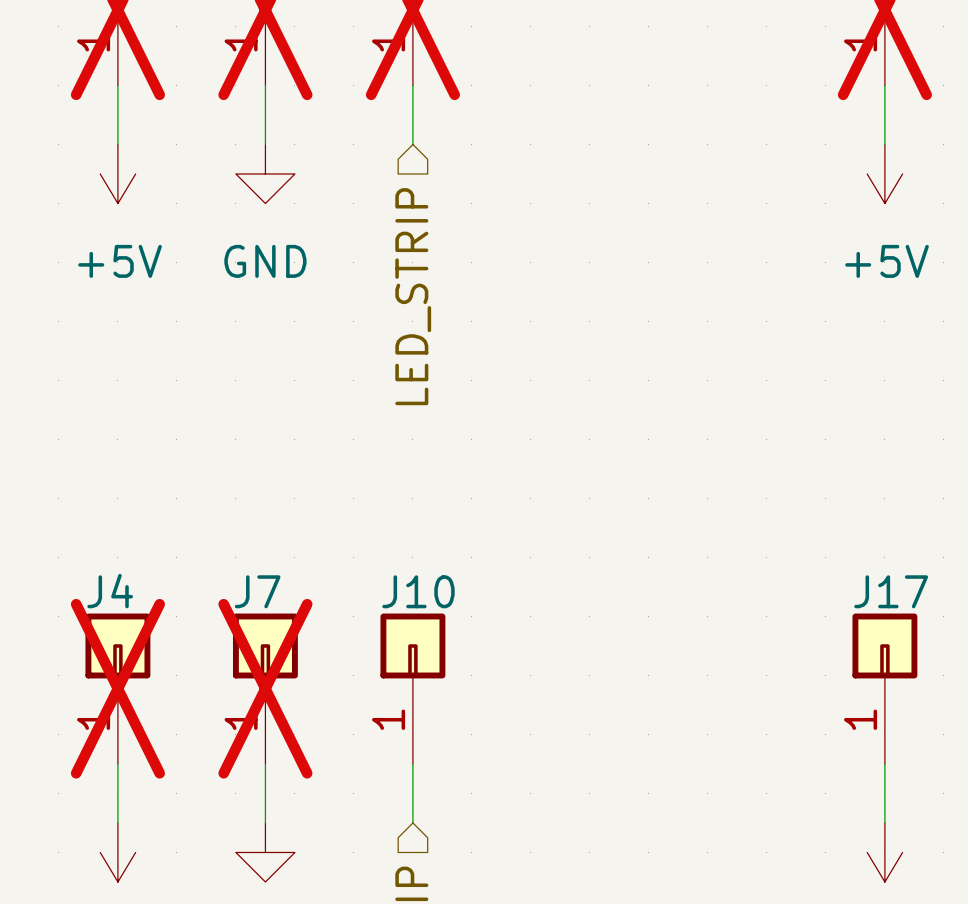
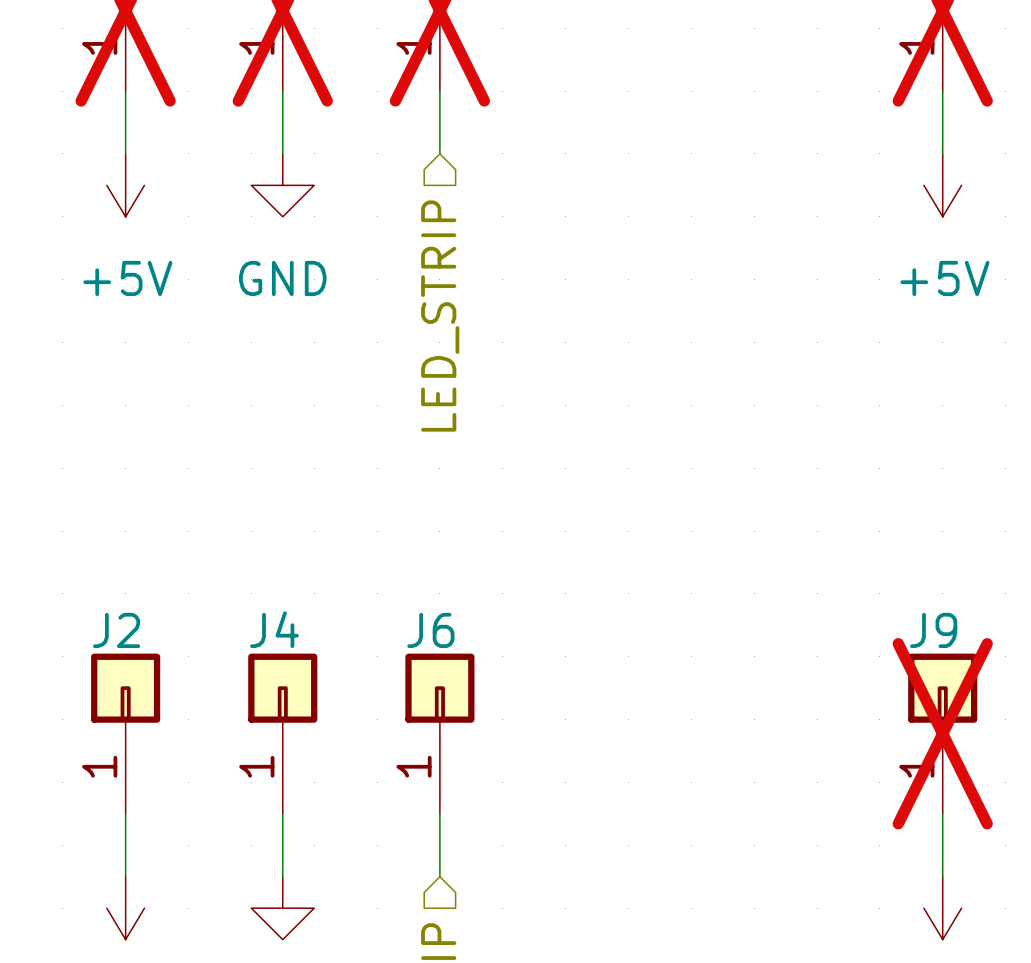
J4 name: J4 (110, 591) -> J2 (116, 630)
J7 name: J7 (257, 591) -> J4 (274, 629)
J10 name: J10 (418, 591) -> J6 (430, 630)
J17 name: J17 (891, 591) -> J9 (933, 630)
J4 do-not-place cross: (117, 688) -> none
J7 do-not-place cross: (265, 688) -> none
J17 do-not-place cross: none -> (942, 733)

